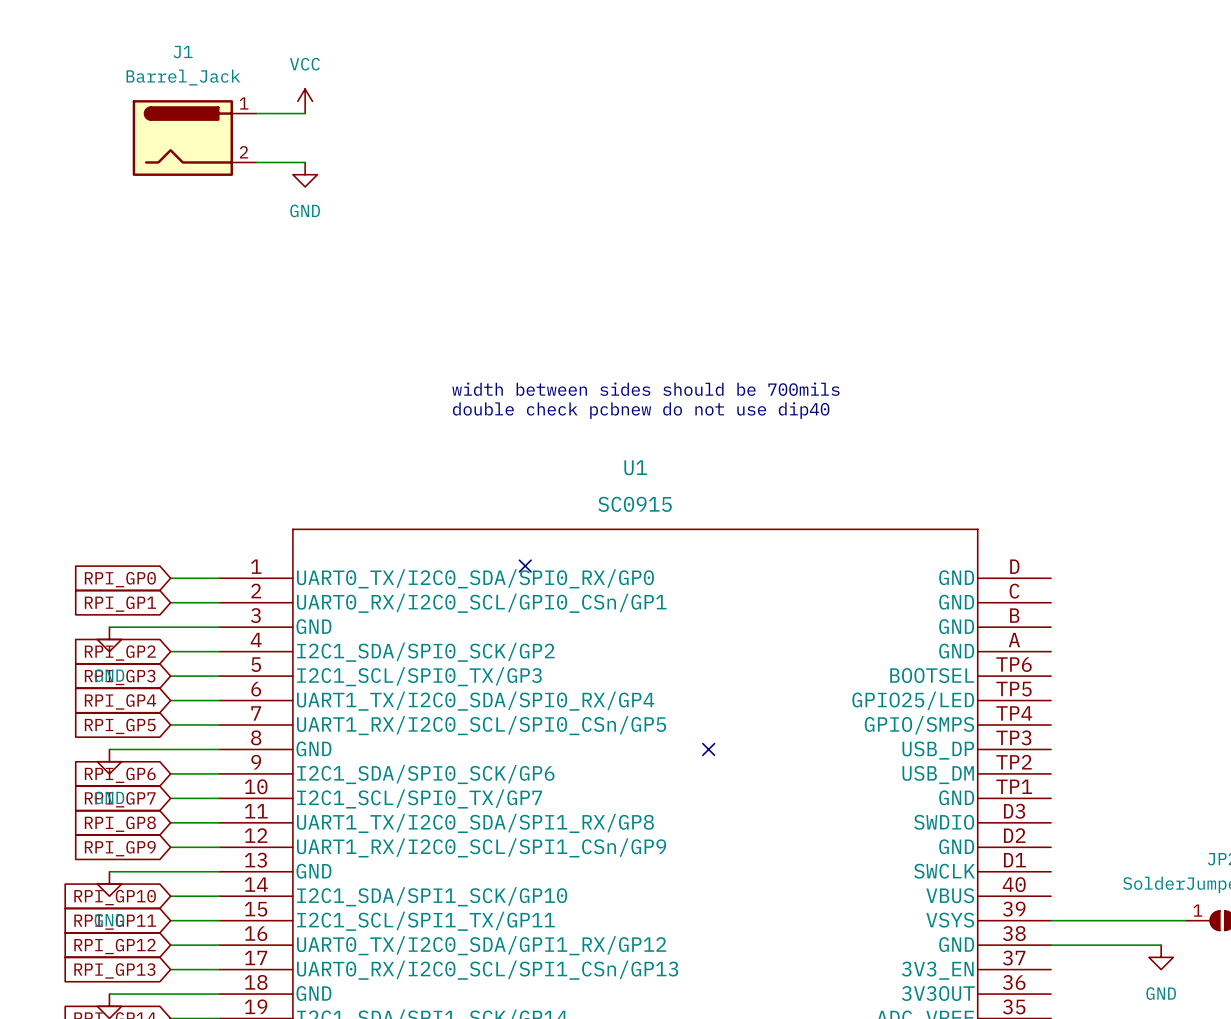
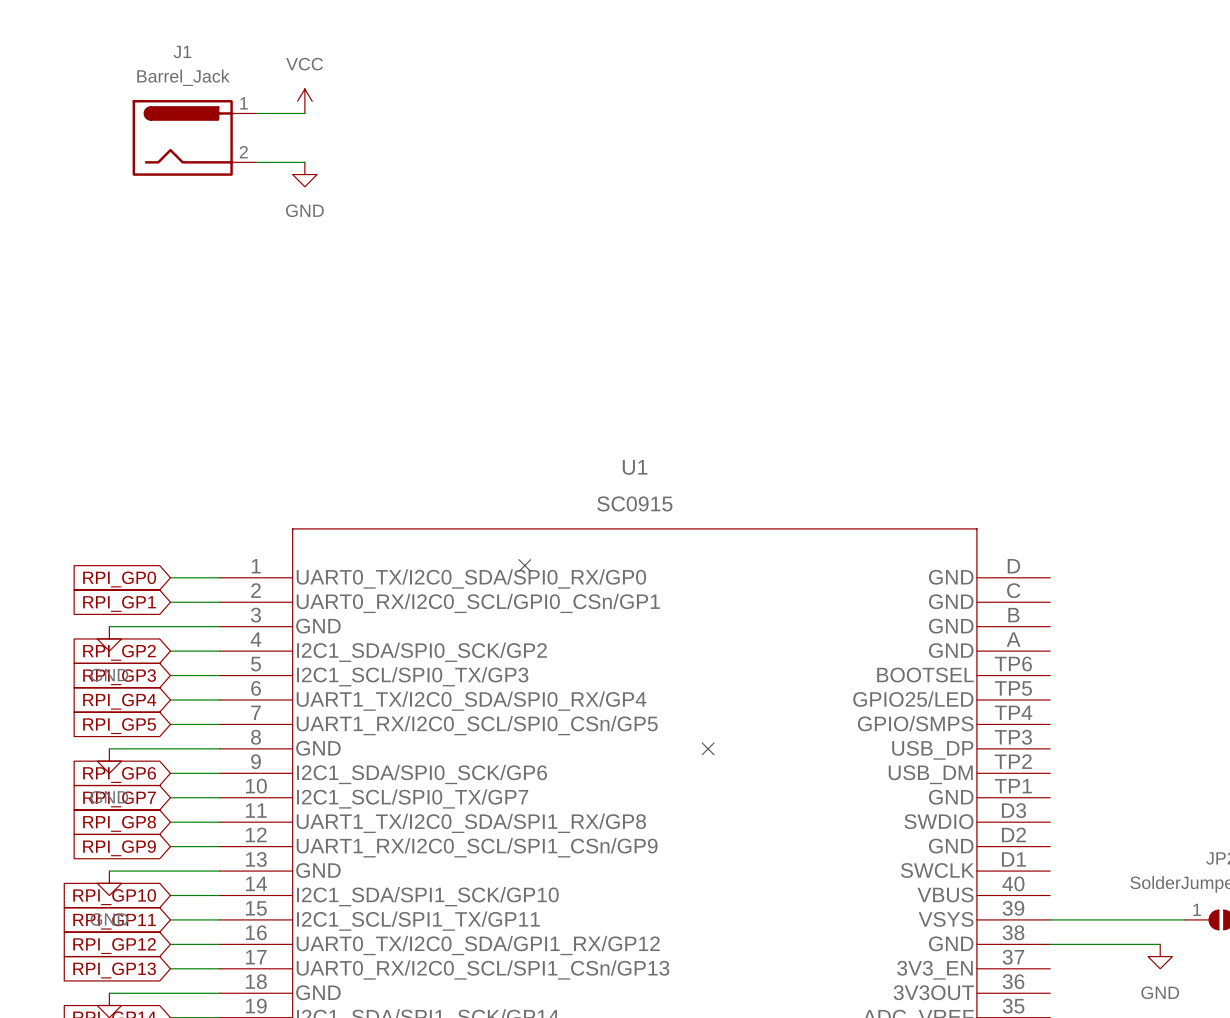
text: width between sides should be 700mils (645, 389) -> none
text: double check pcbnew do not use dip40 (641, 410) -> none

